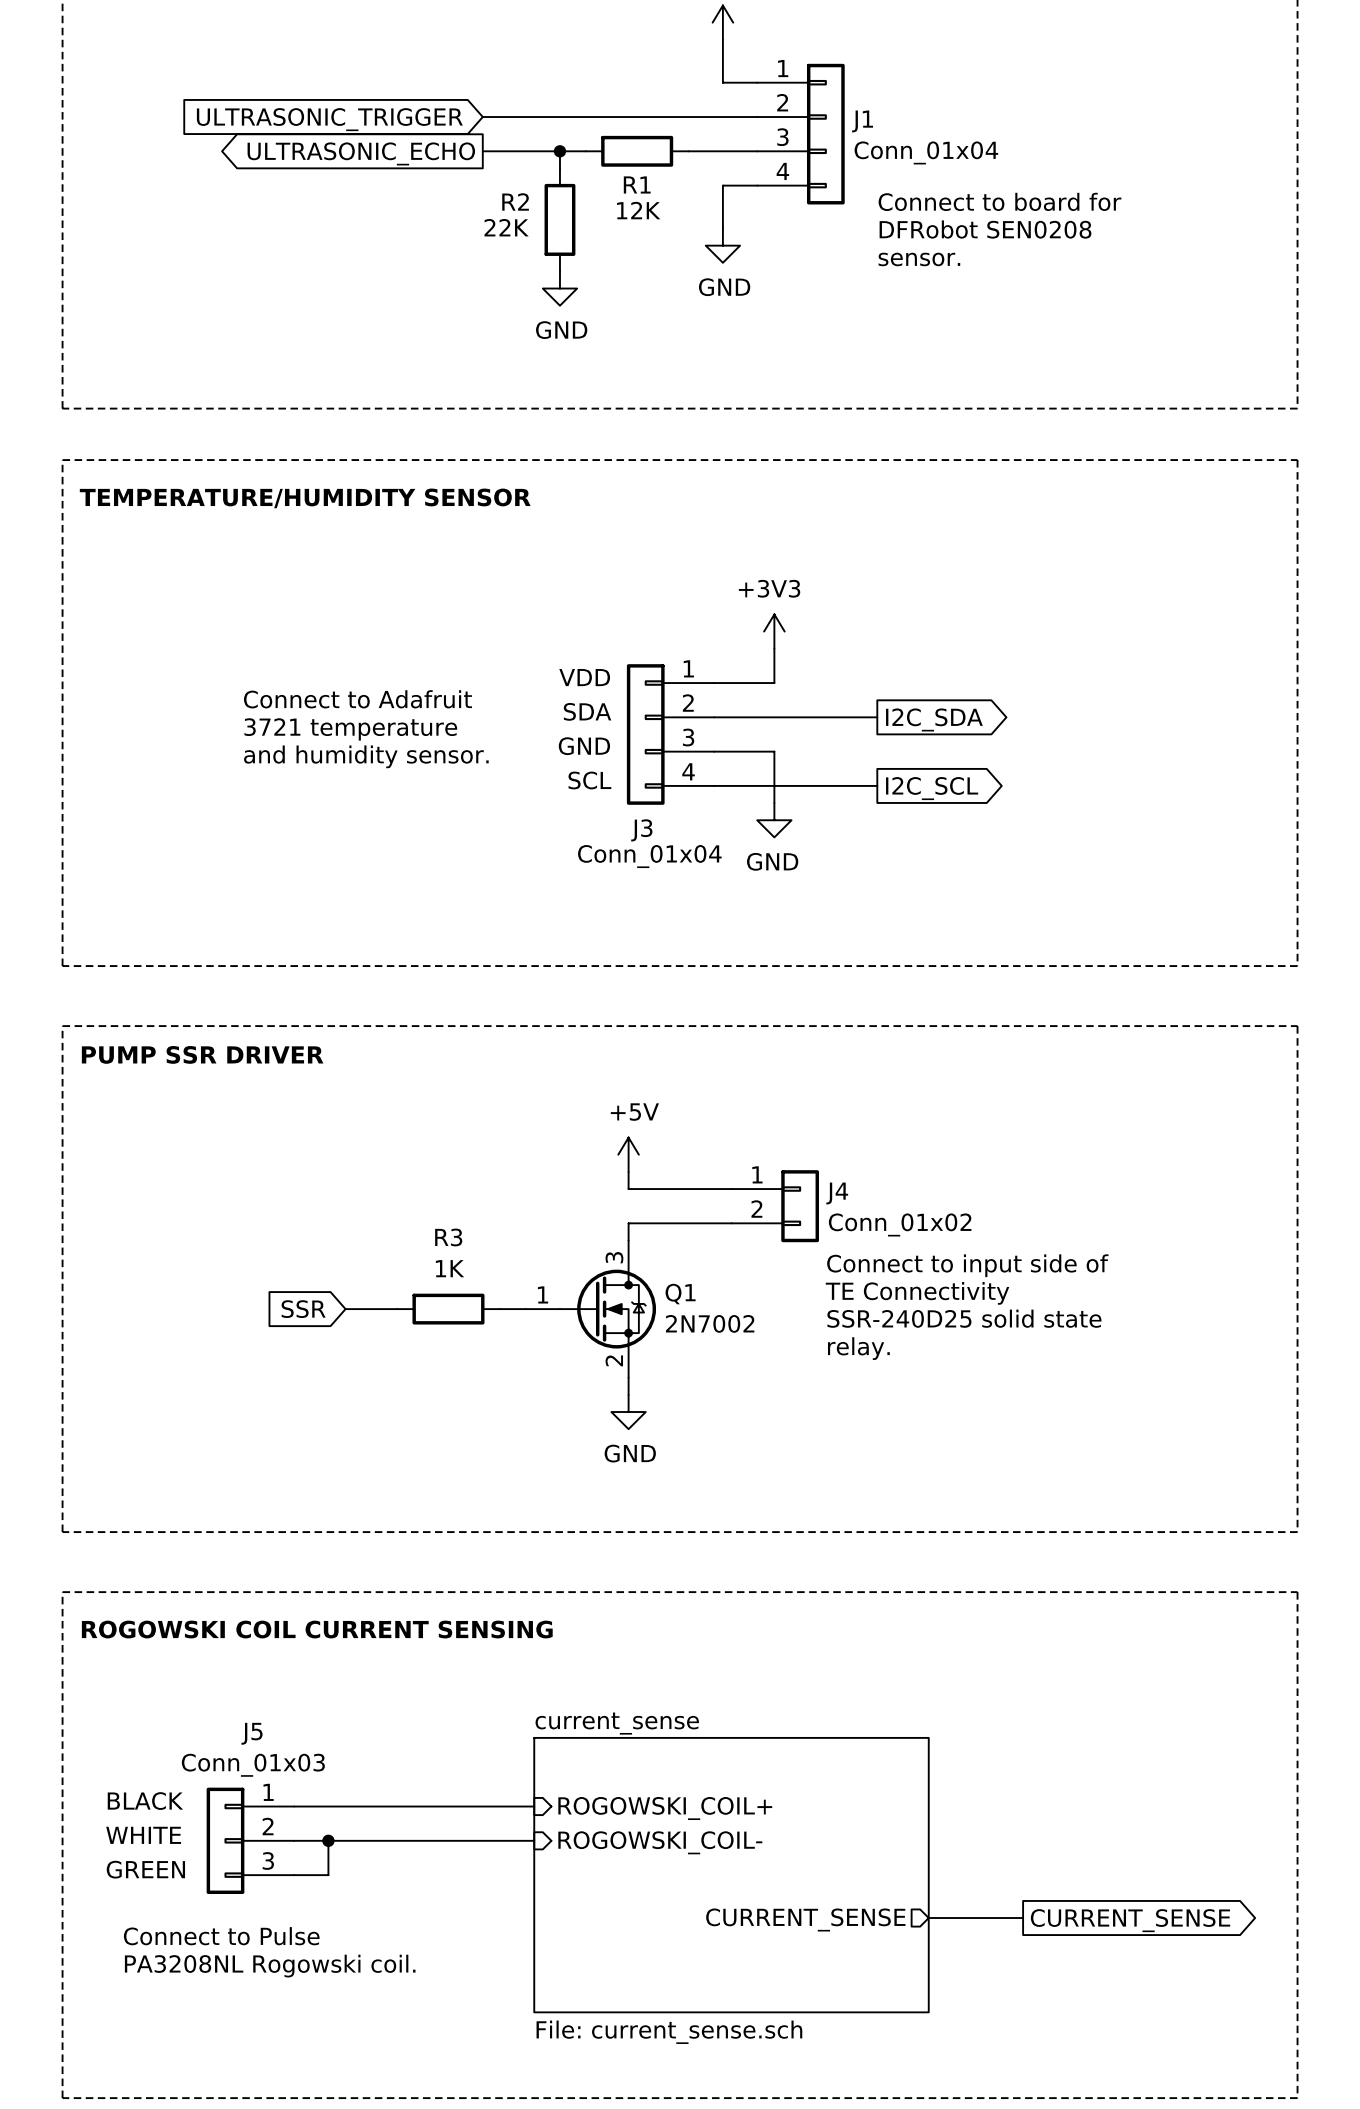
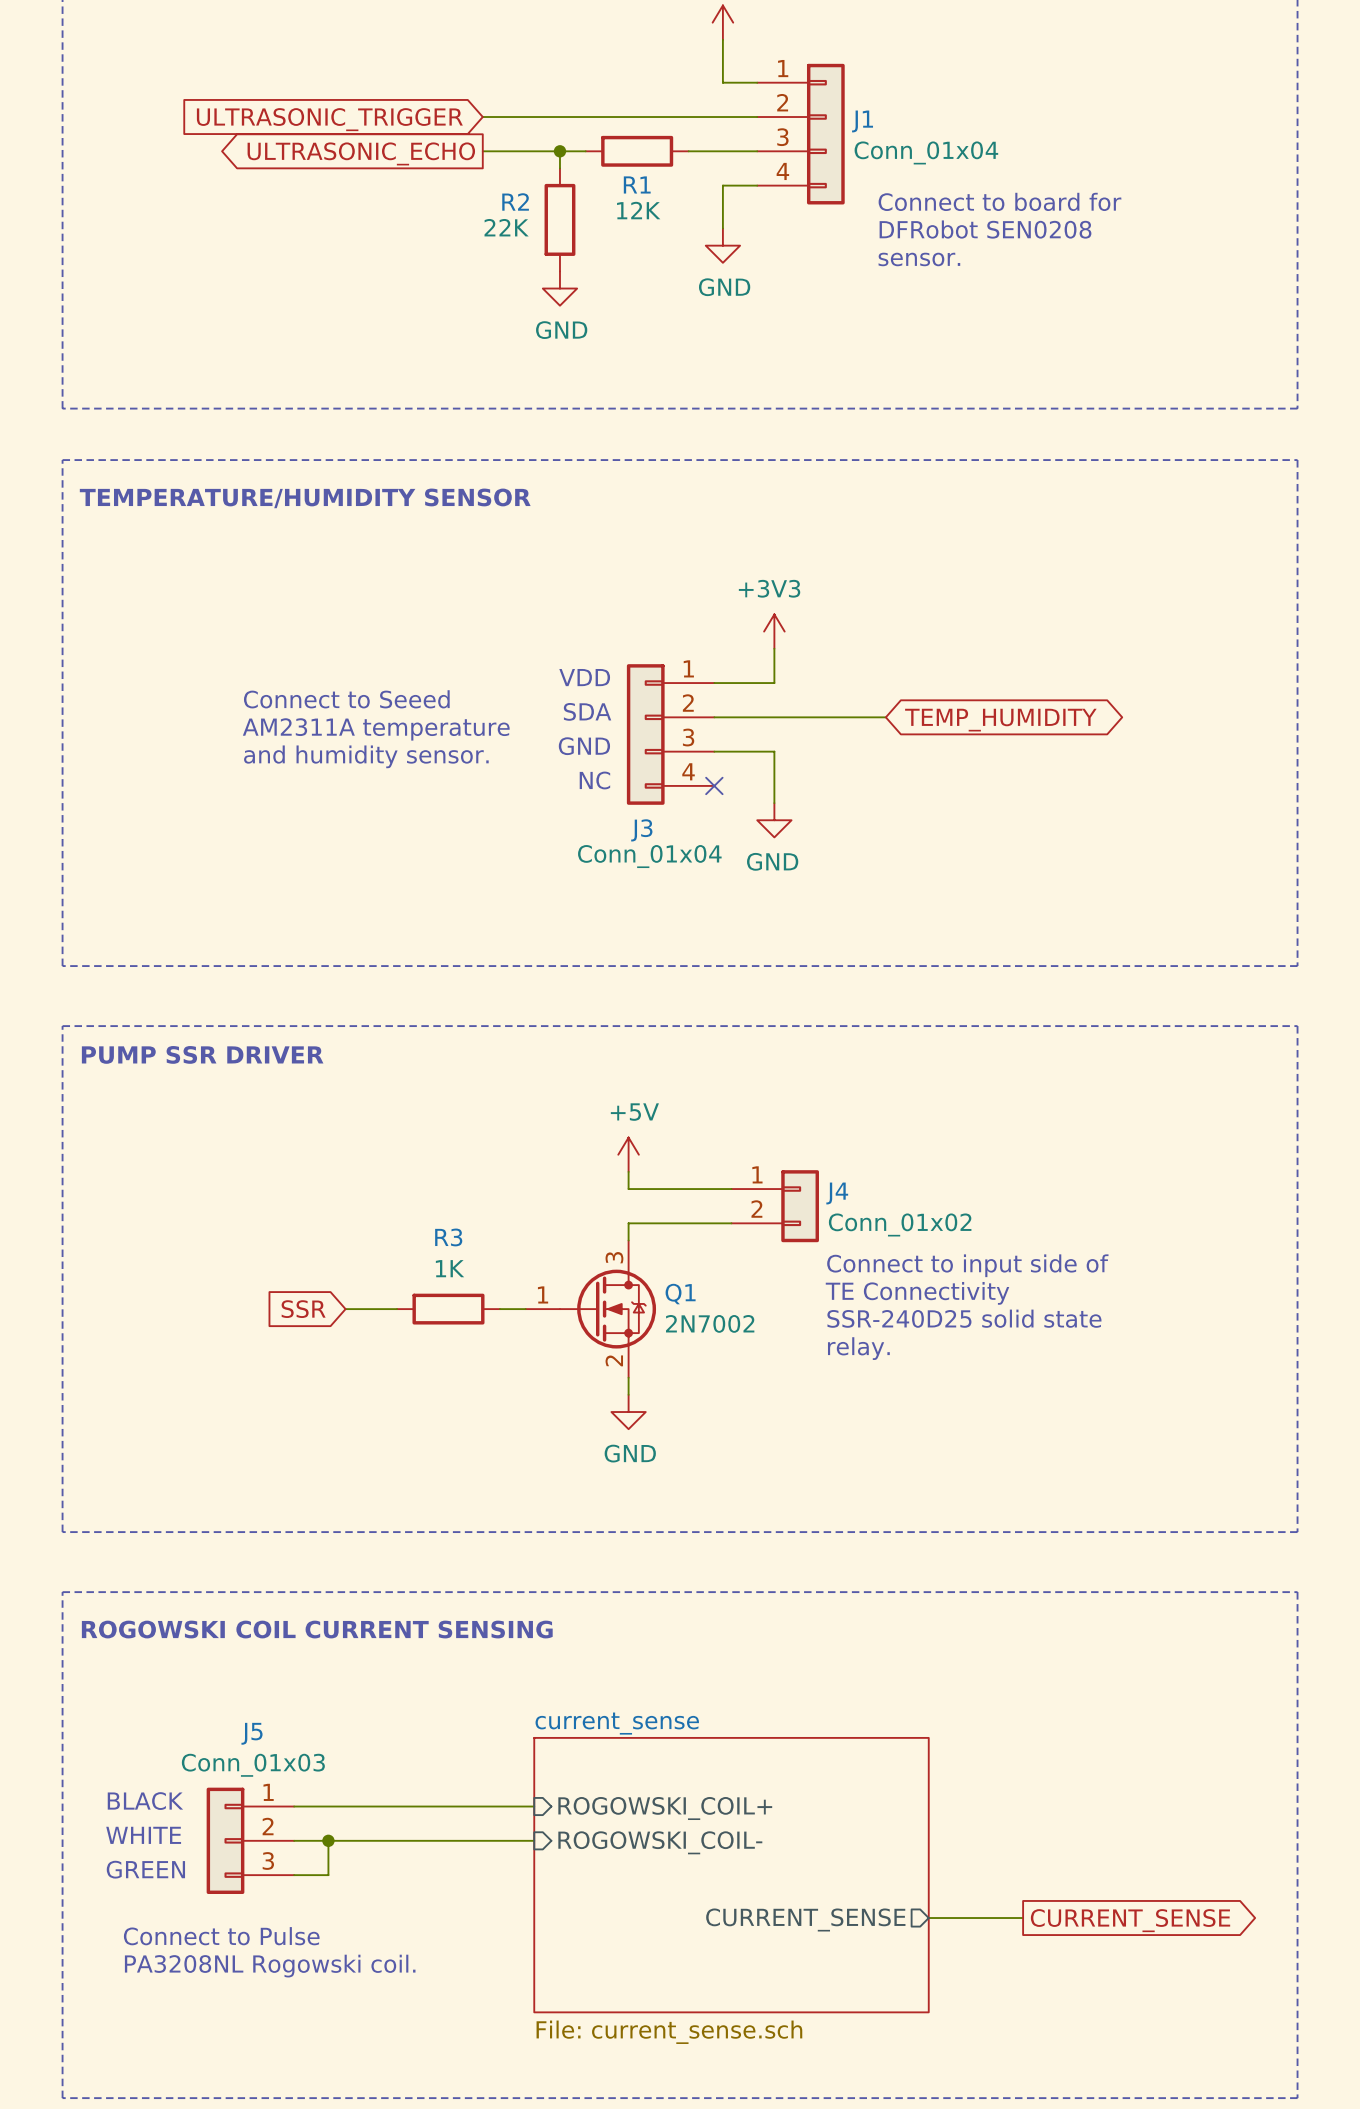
text: Connect to Adafruit (358, 699) -> Connect to Seeed (346, 699)
wire: none -> (877, 717) (885, 717)
global label shape: output (934, 719) -> bidirectional (1000, 720)
global label: I2C_SDA (934, 719) -> TEMP_HUMIDITY (1000, 720)
text: 3721 temperature (350, 729) -> AM2311A temperature (376, 729)
text: SCL (589, 780) -> NC (594, 780)
wire: (714, 785) (877, 785) -> none
no-connect mark: none -> (714, 785)
global label: I2C_SCL (932, 788) -> none

